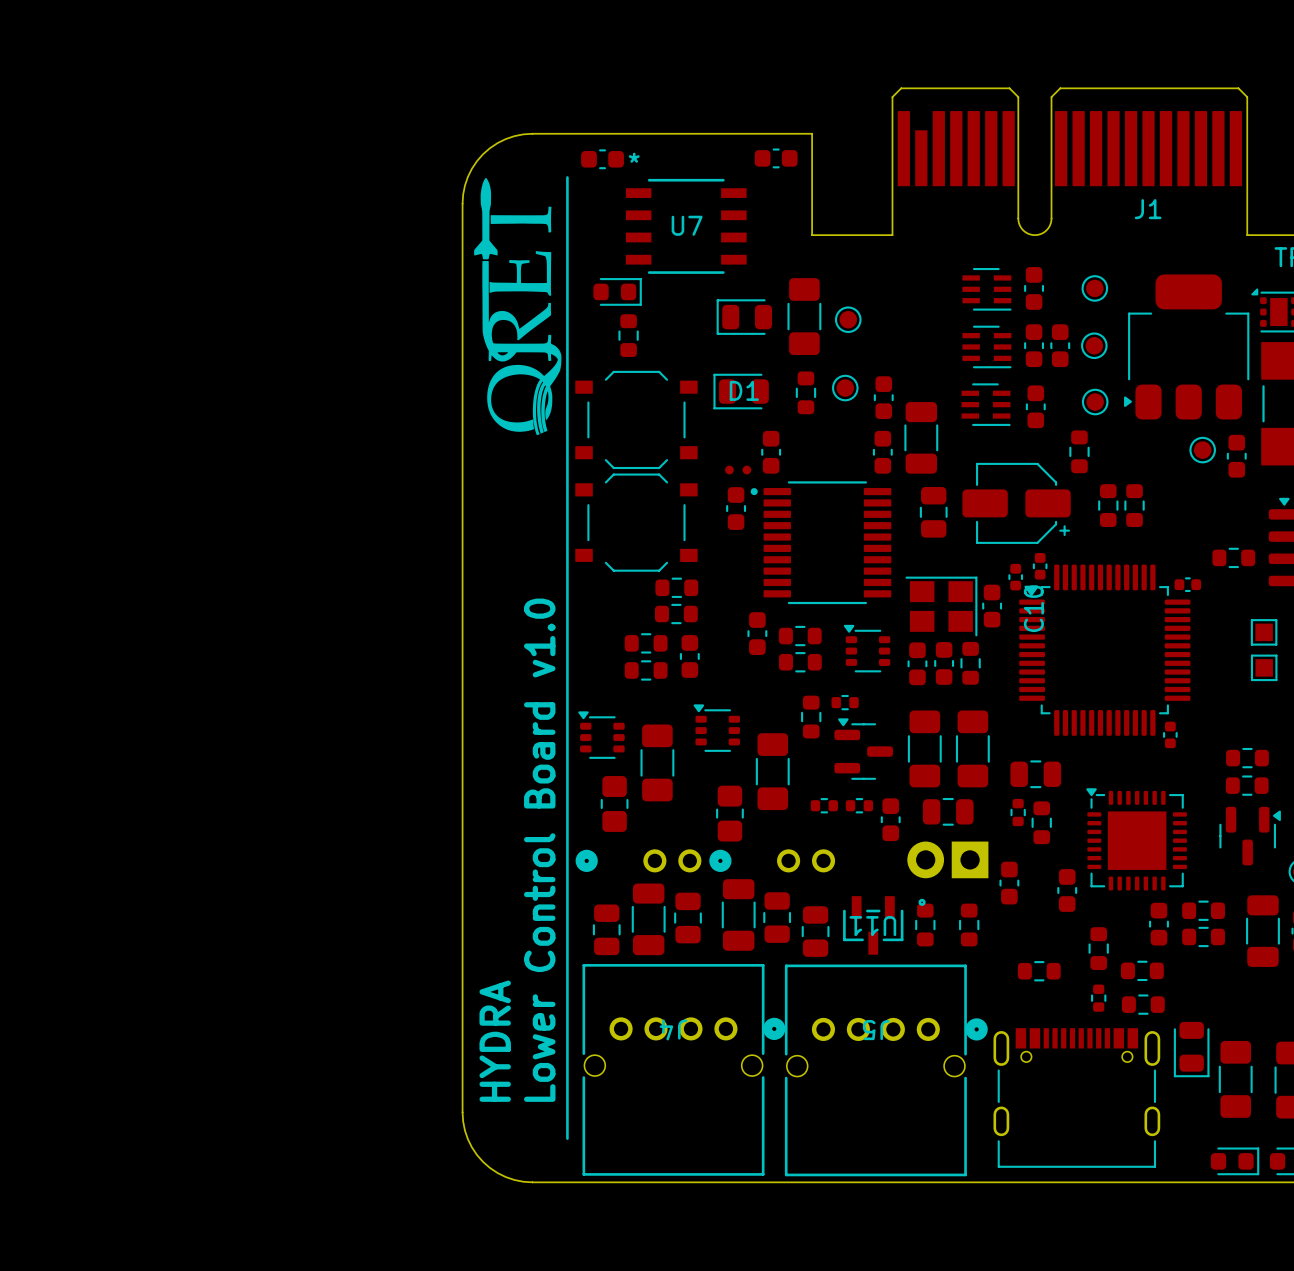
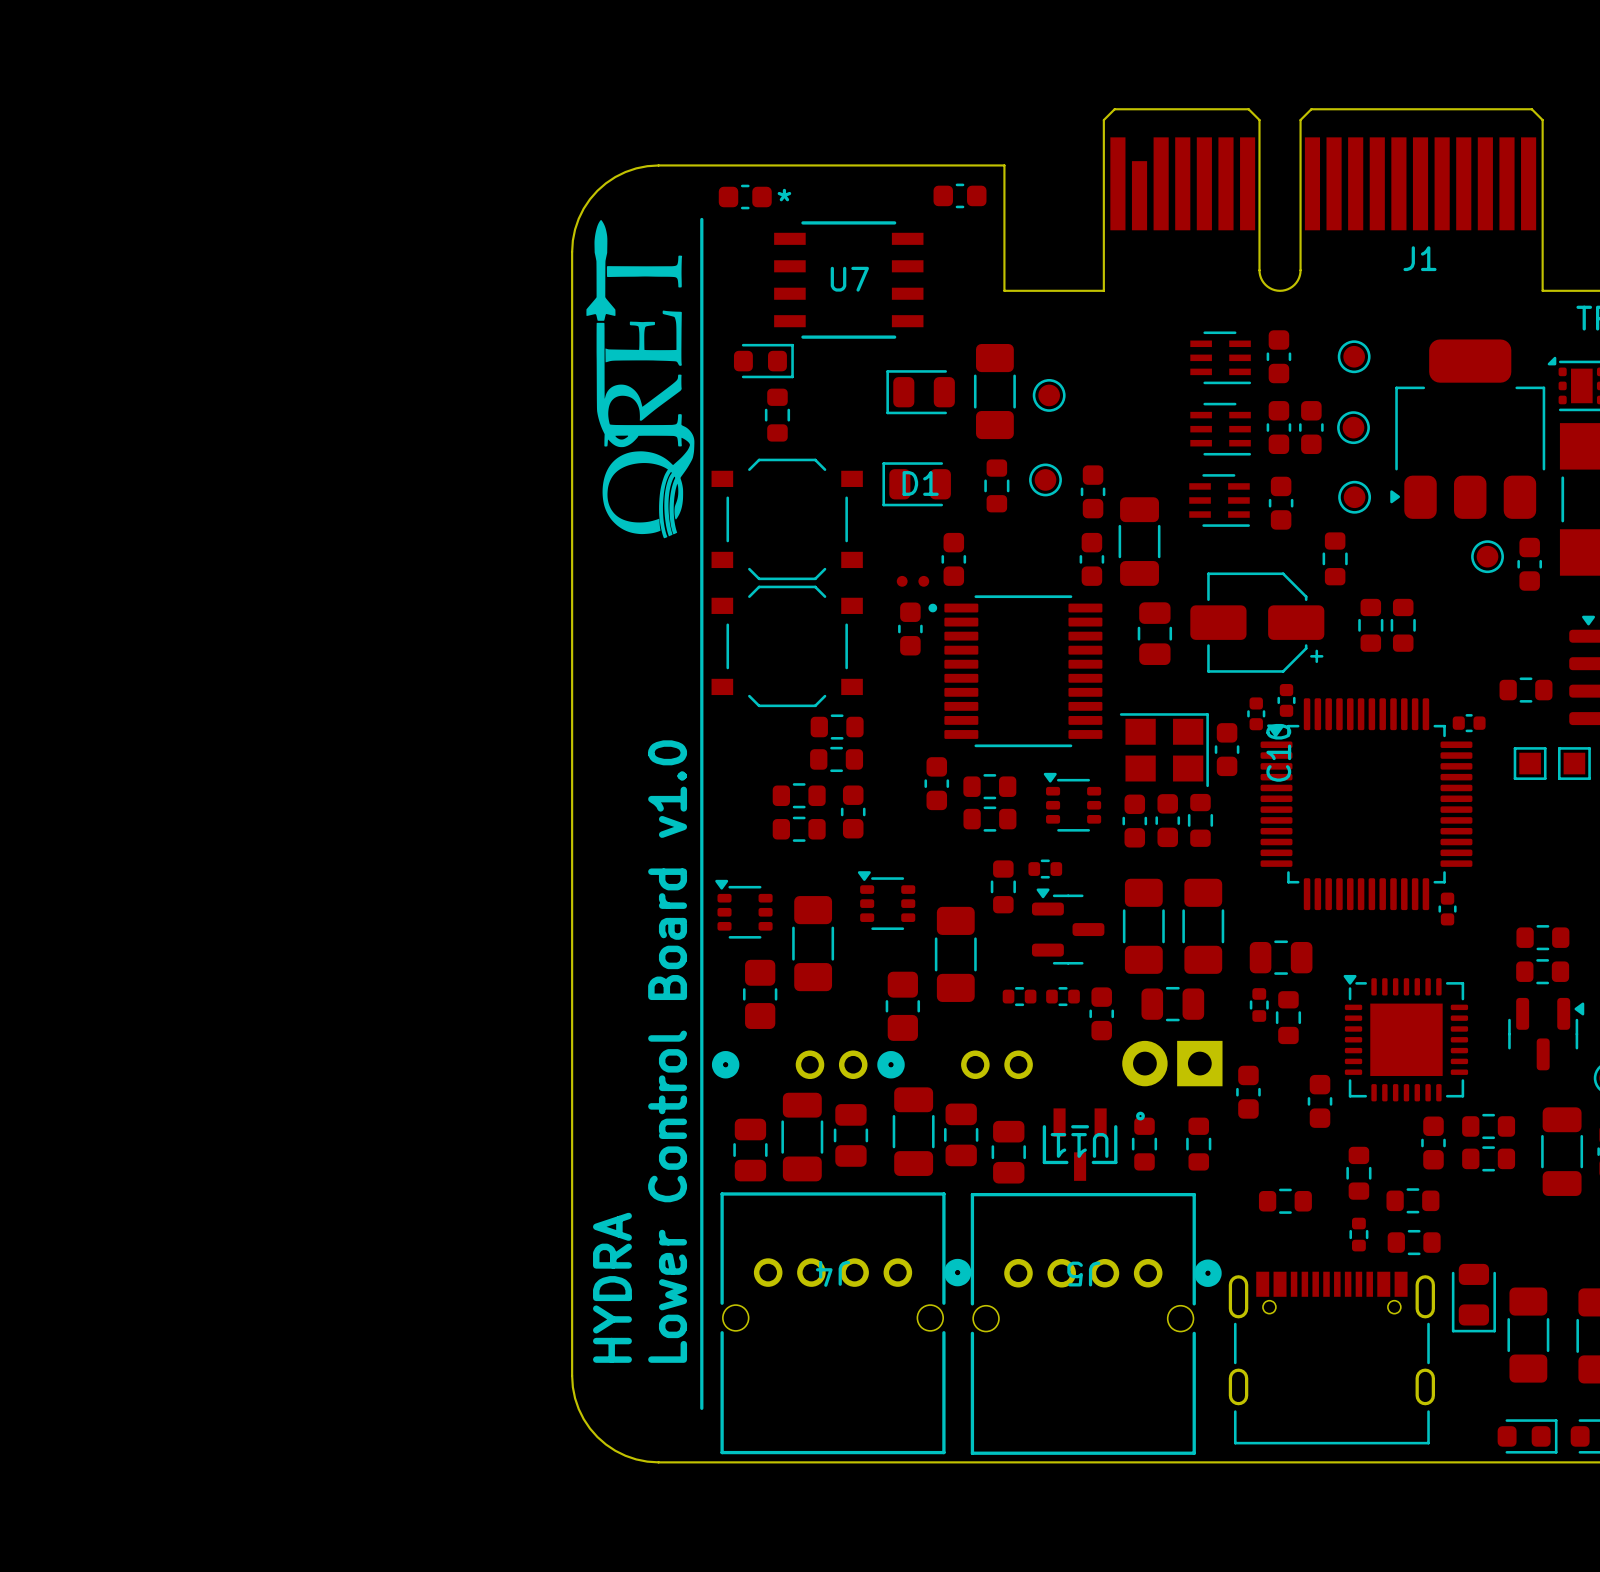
part: none -> (1530, 763)
part: none -> (1574, 763)
part: (1264, 632) -> none
part: (1264, 667) -> none

